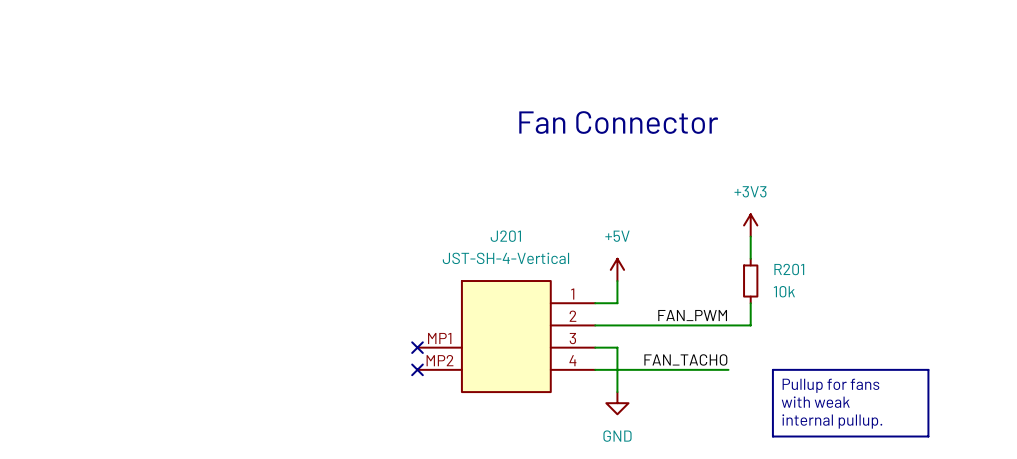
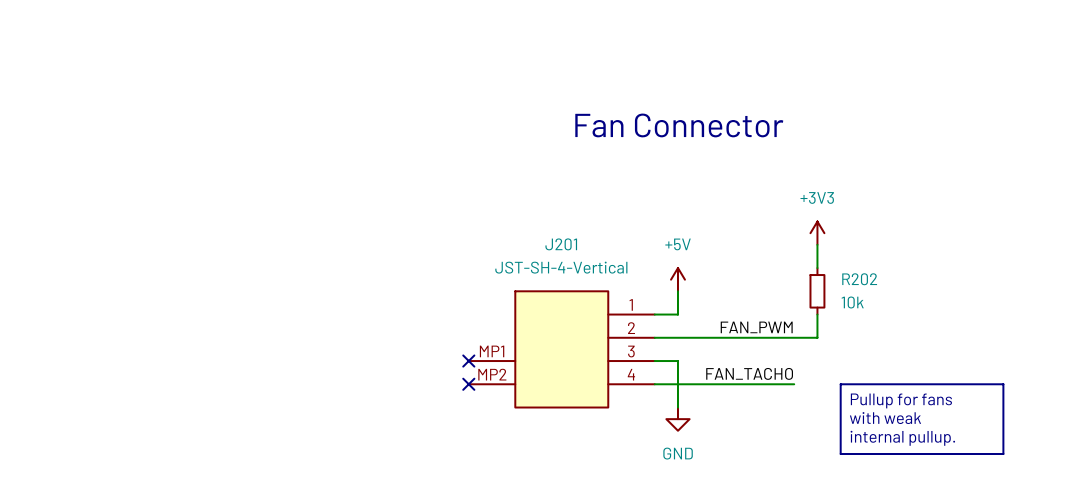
R201 name: R201 (789, 269) -> R202 (859, 279)

